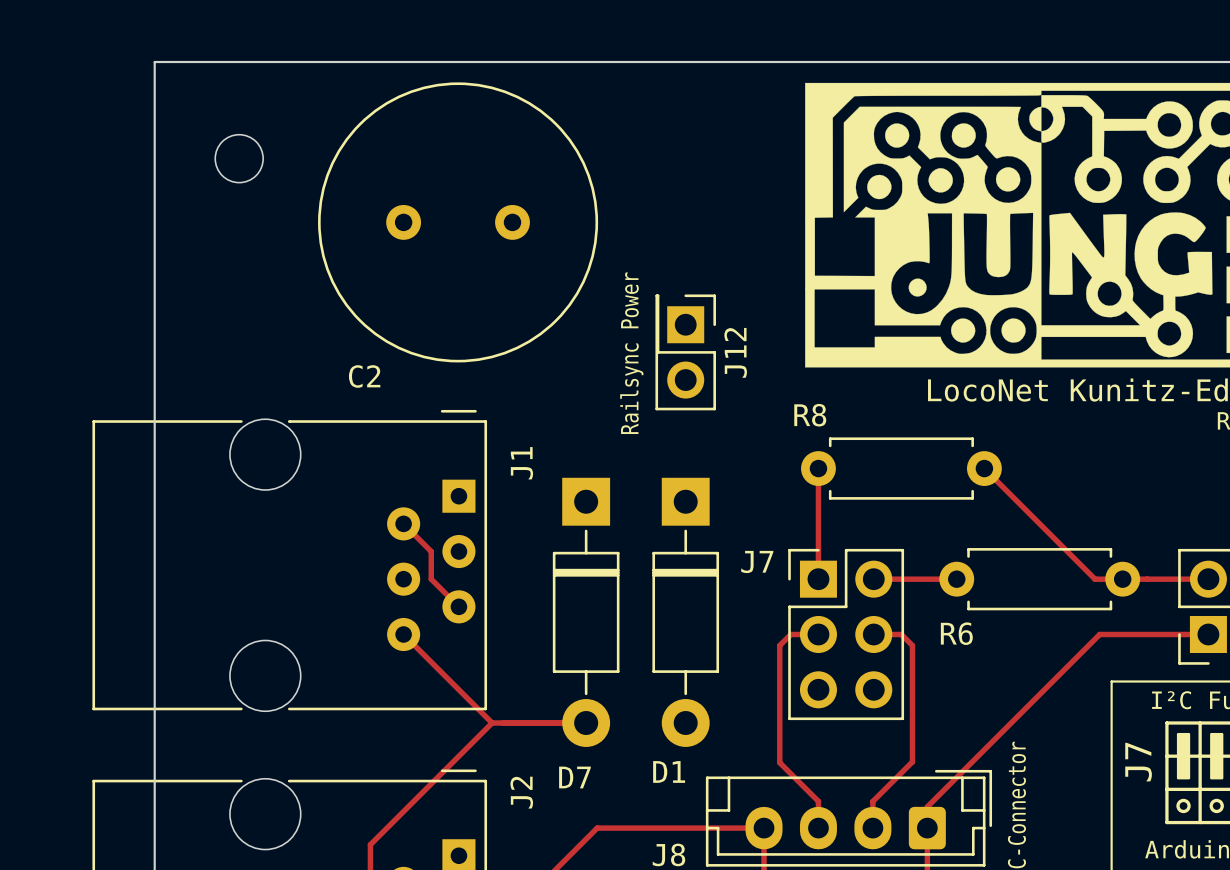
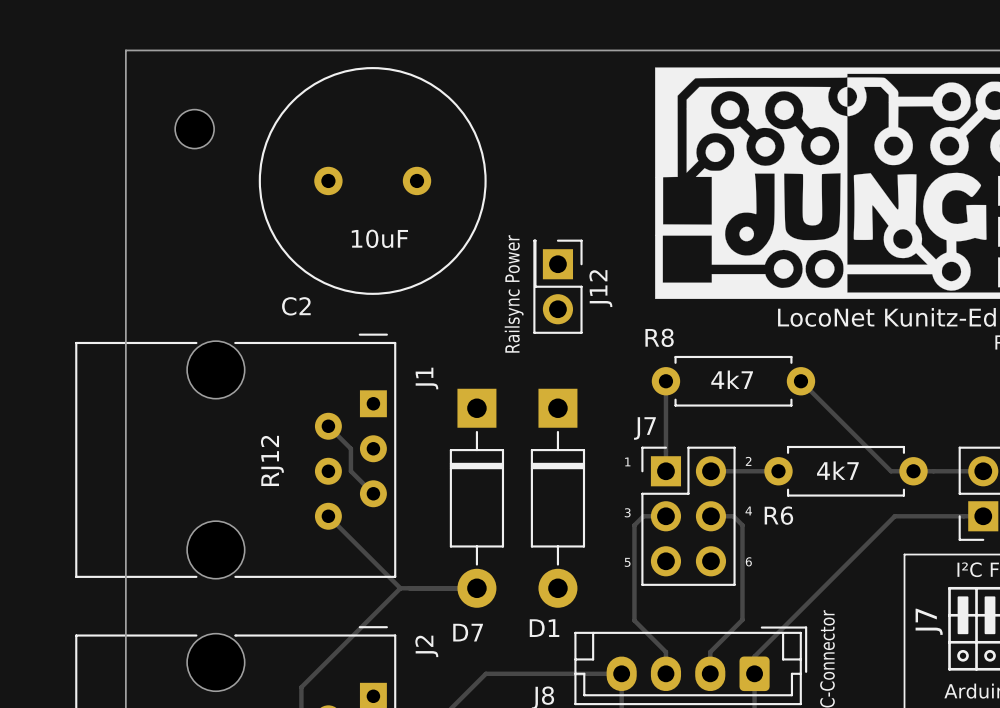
C2 value: none -> 10uF (379, 238)
R8 value: none -> 4k7 (732, 379)
J7 name position: J7 (757, 561) -> J7 (644, 428)
J1 value: none -> RJ12 (272, 460)
text: none -> 1 (627, 461)
text: none -> 2 (748, 461)
R6 value: none -> 4k7 (837, 470)
text: none -> 4 (748, 510)
text: none -> 3 (627, 512)
text: none -> 6 (748, 561)
text: none -> 5 (627, 562)

